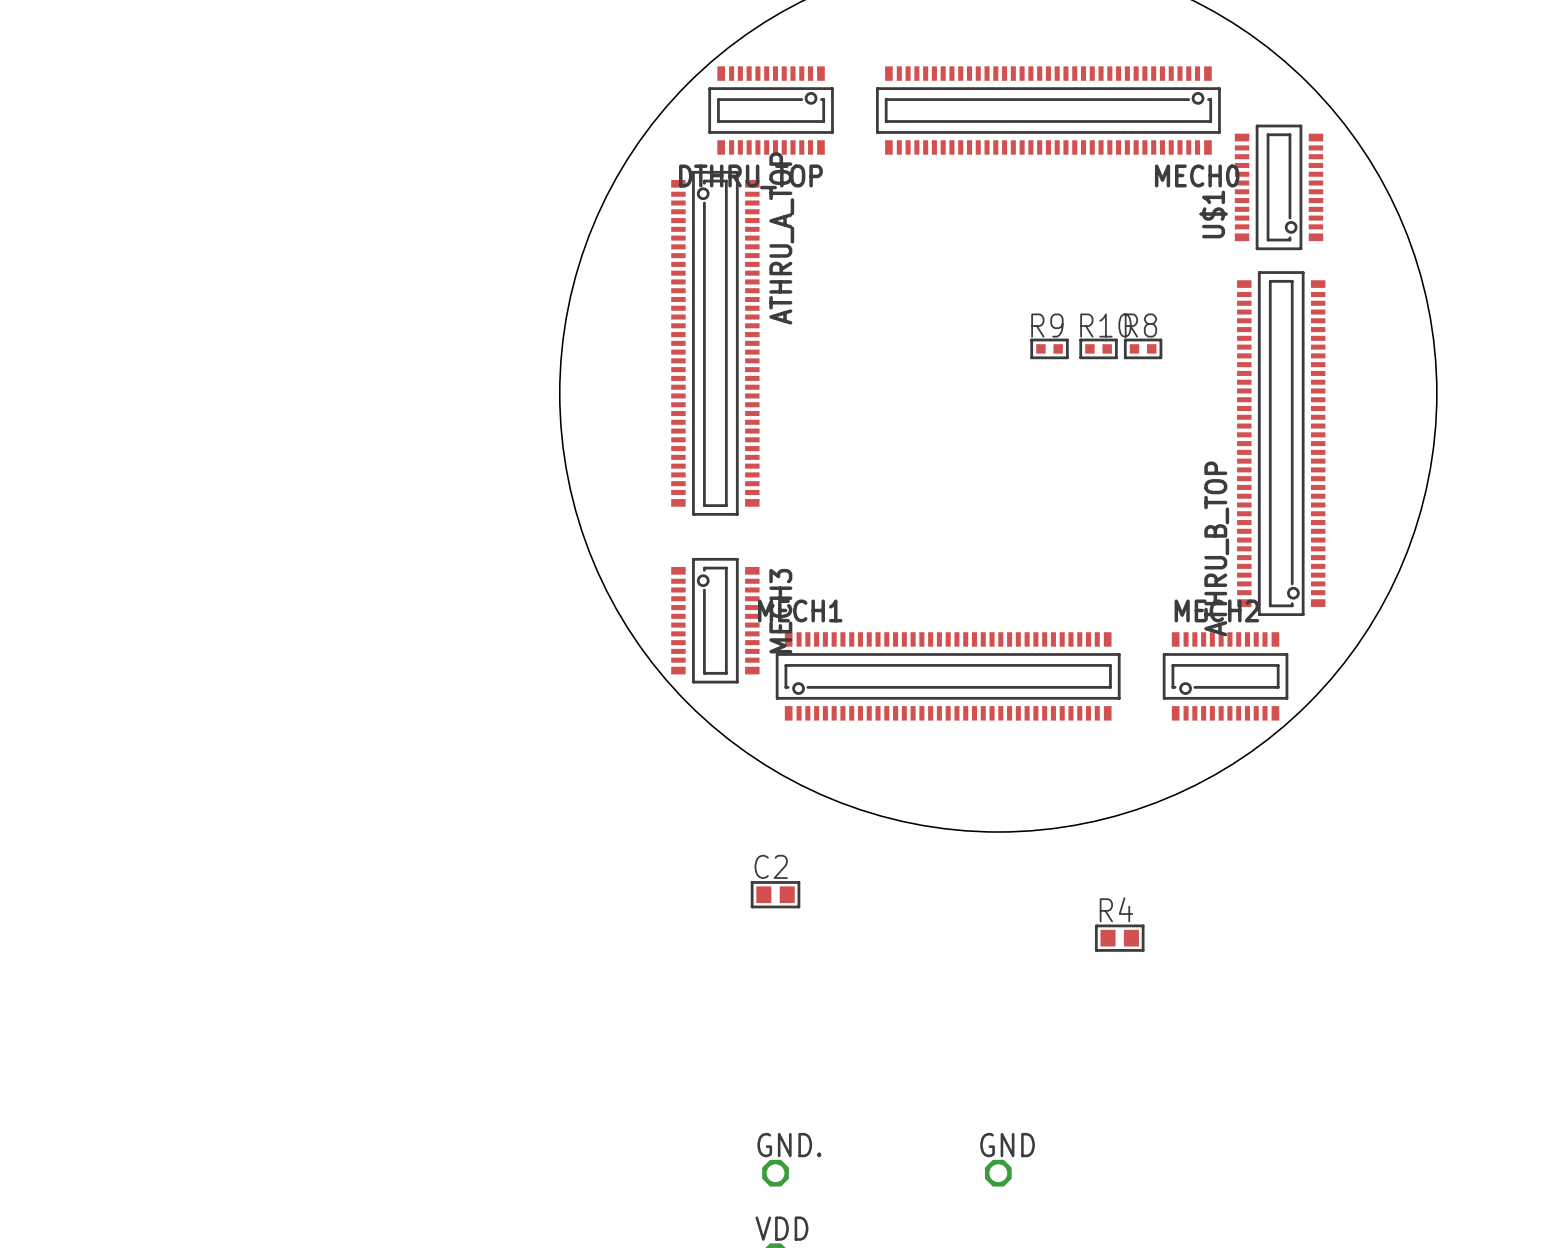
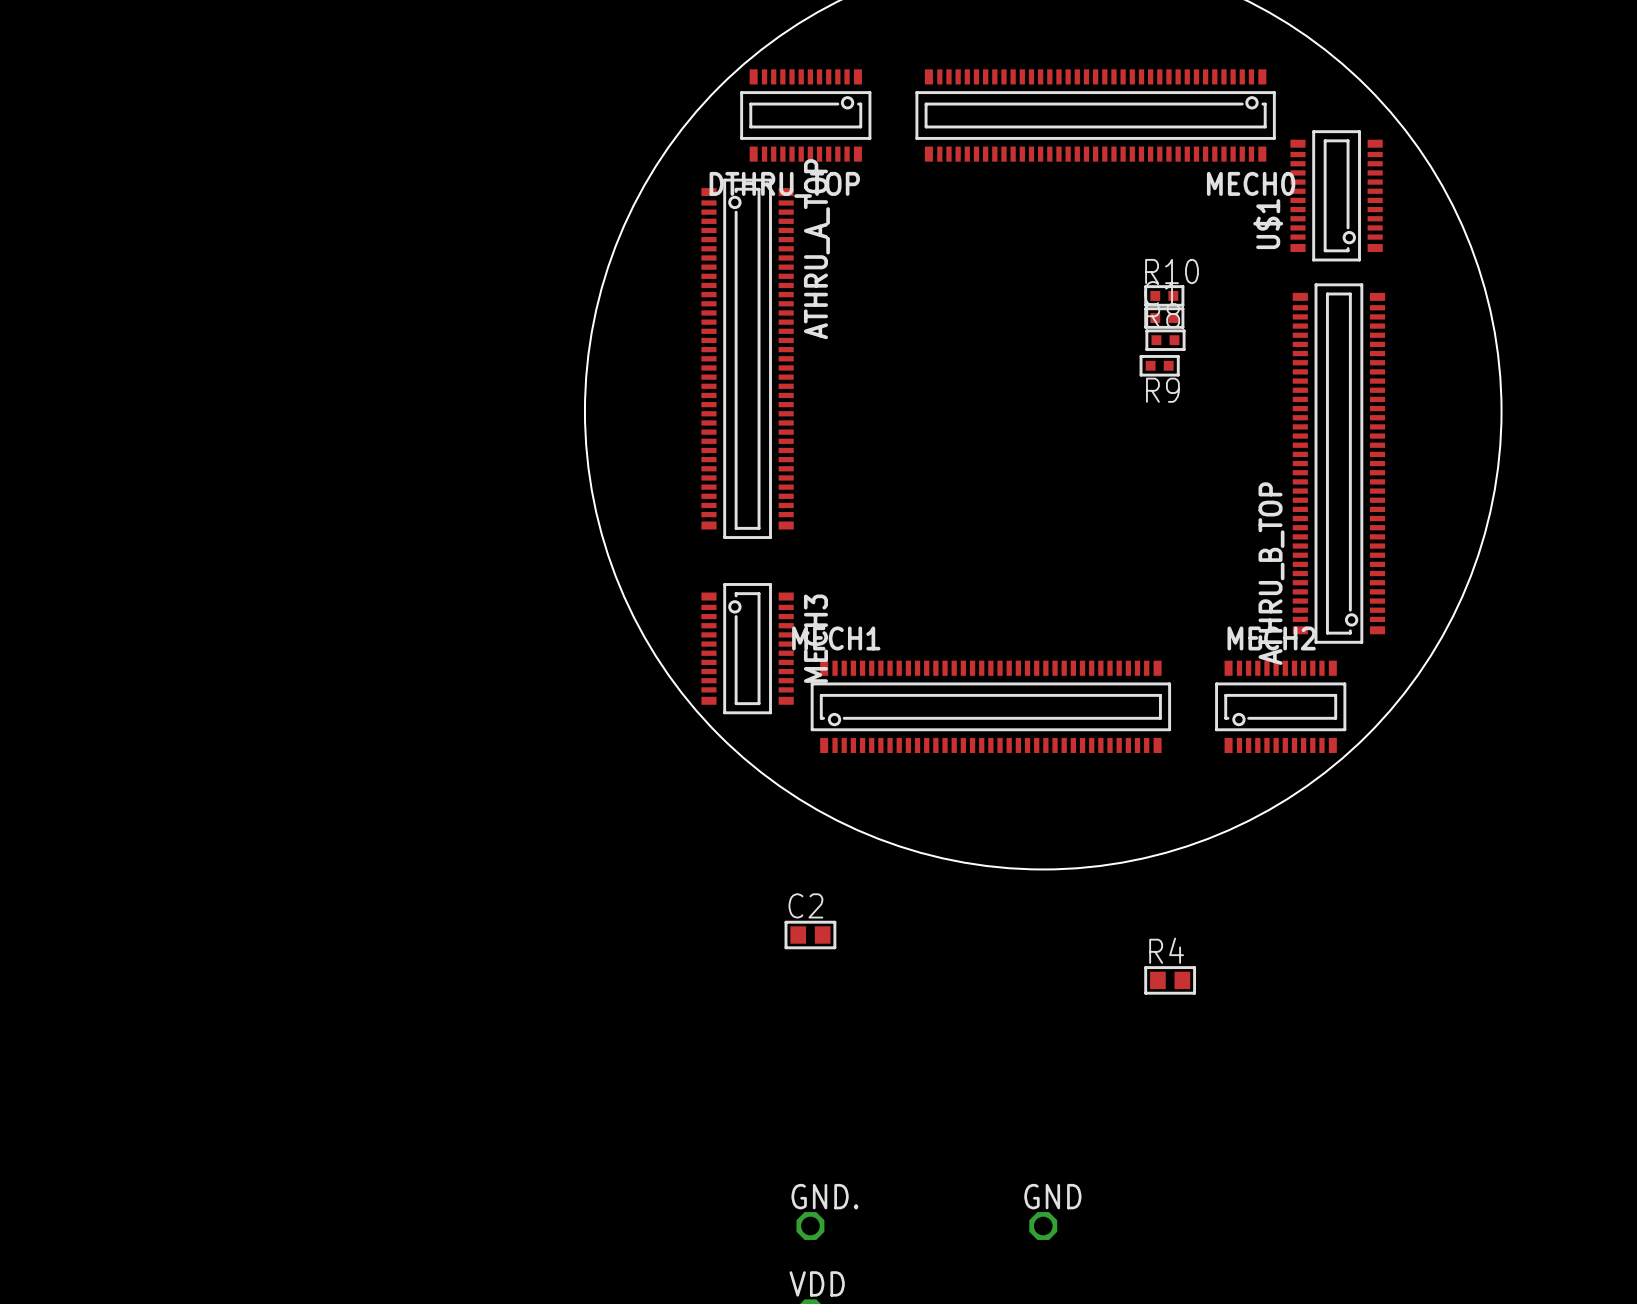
part: none -> (1164, 318)
R9 name position: R9 (1047, 325) -> R9 (1162, 390)
R9 position: (1049, 348) -> (1159, 365)
R10 position: (1098, 348) -> (1164, 295)
R8 position: (1143, 348) -> (1165, 340)

